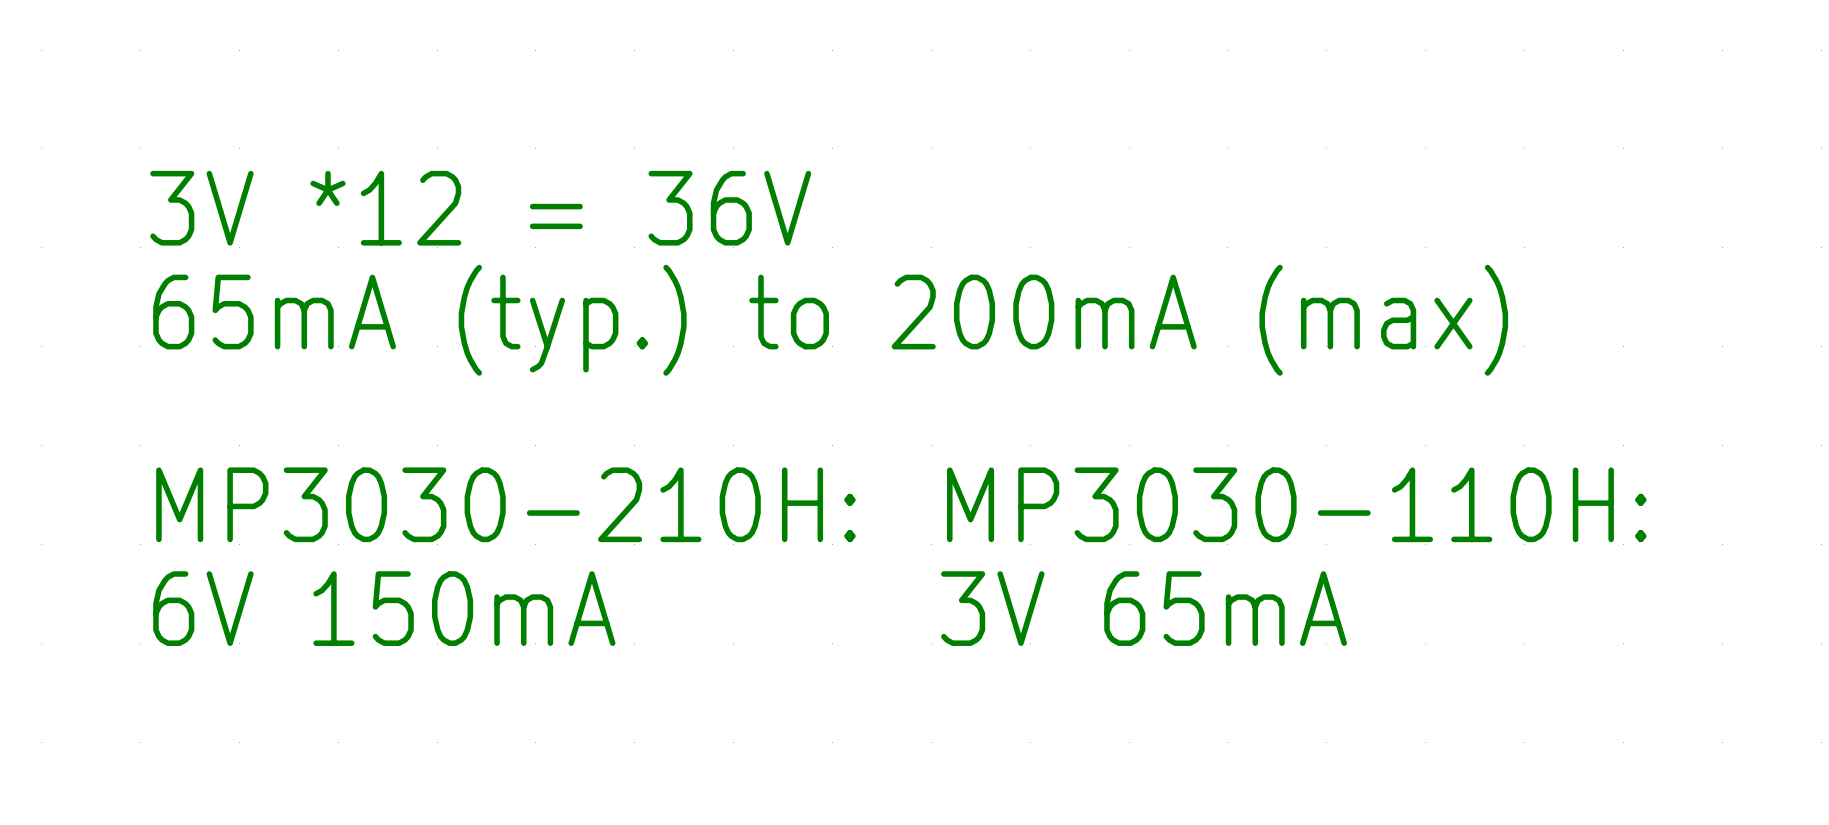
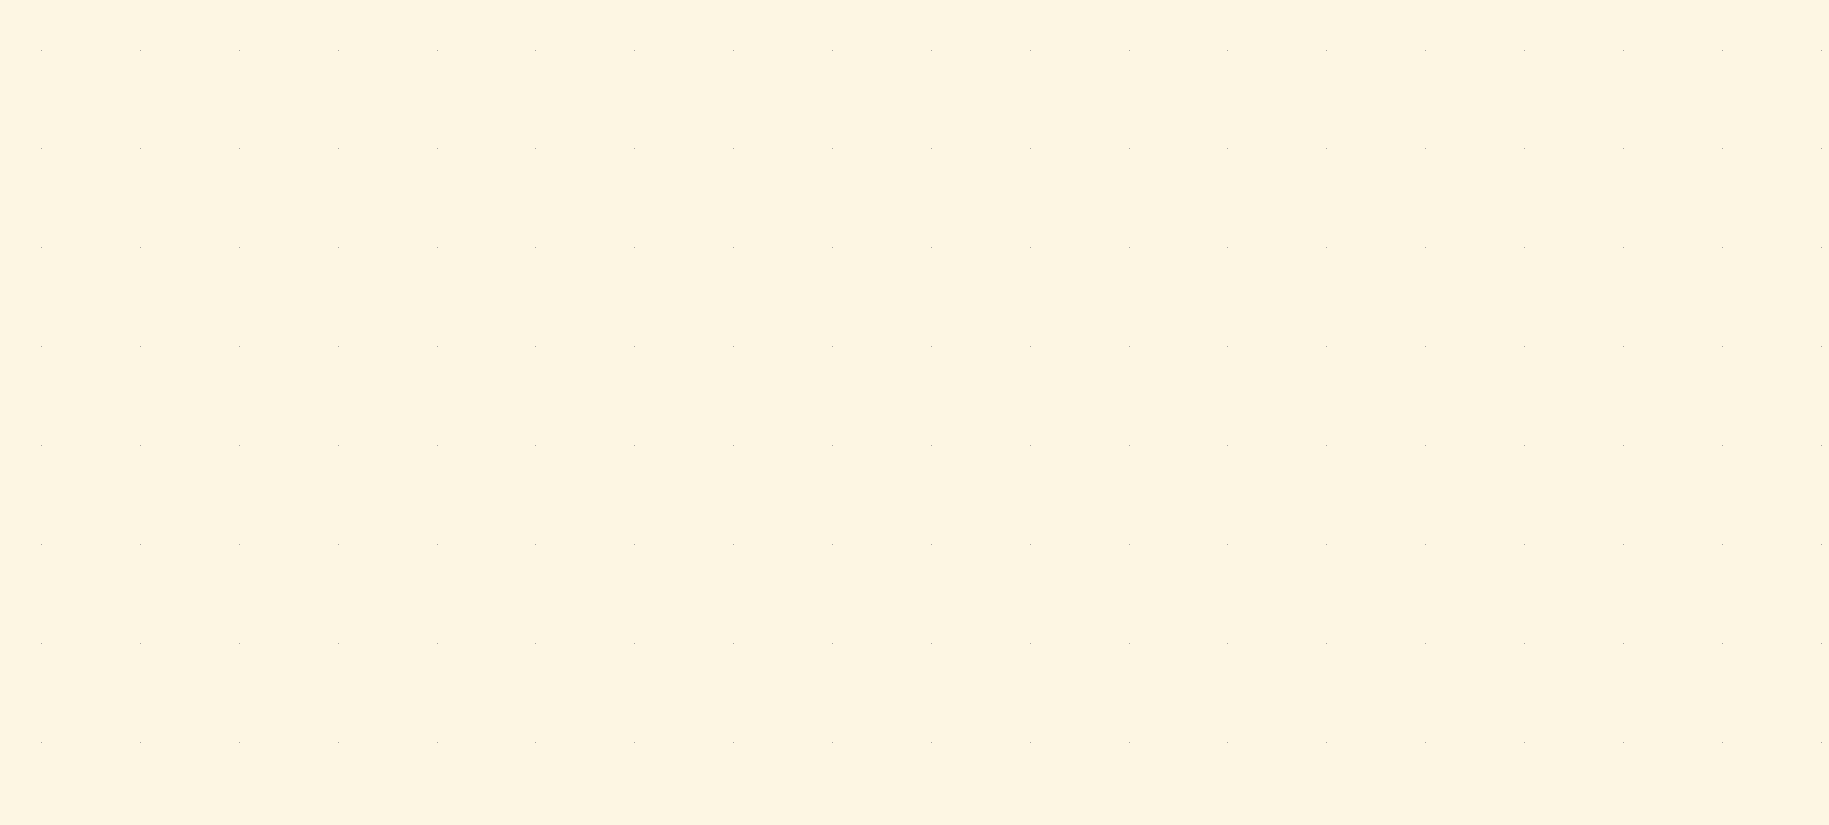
text: 3V *12 = 36V (480, 208) -> none
text: 65mA (typ.) to 200mA (max) (830, 320) -> none
text: MP3030-210H: (505, 504) -> none
text: MP3030-110H: (1296, 504) -> none
text: 6V 150mA (384, 608) -> none
text: 3V 65mA (1144, 608) -> none

